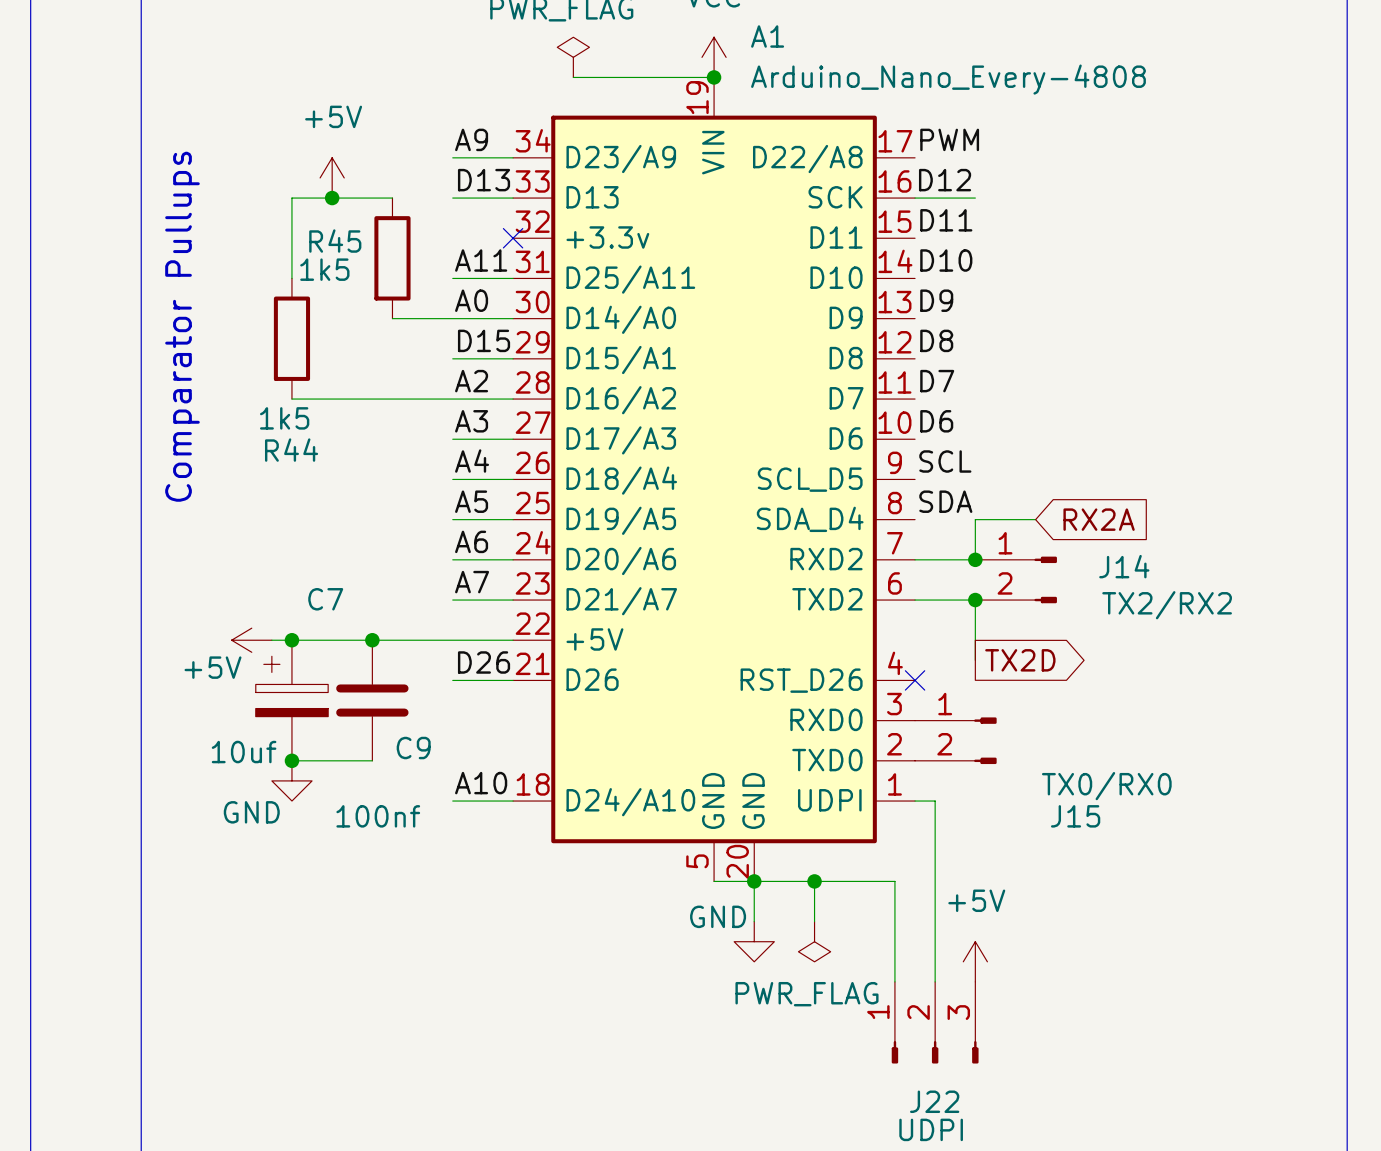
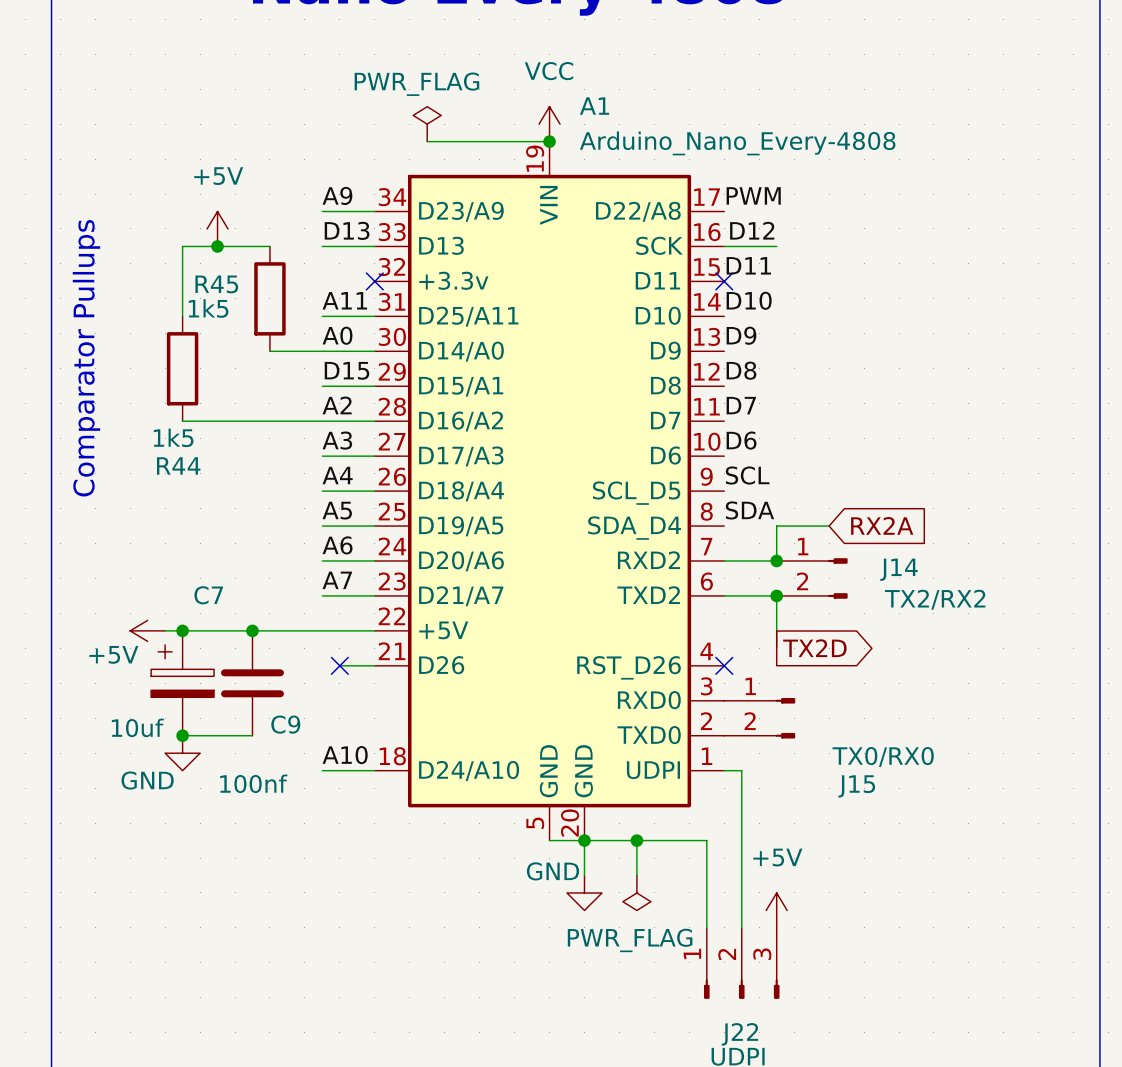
no-connect mark: none -> (724, 281)
label: D26 (484, 662) -> none
wire: (452, 680) (472, 680) -> none
no-connect mark: none -> (339, 665)

